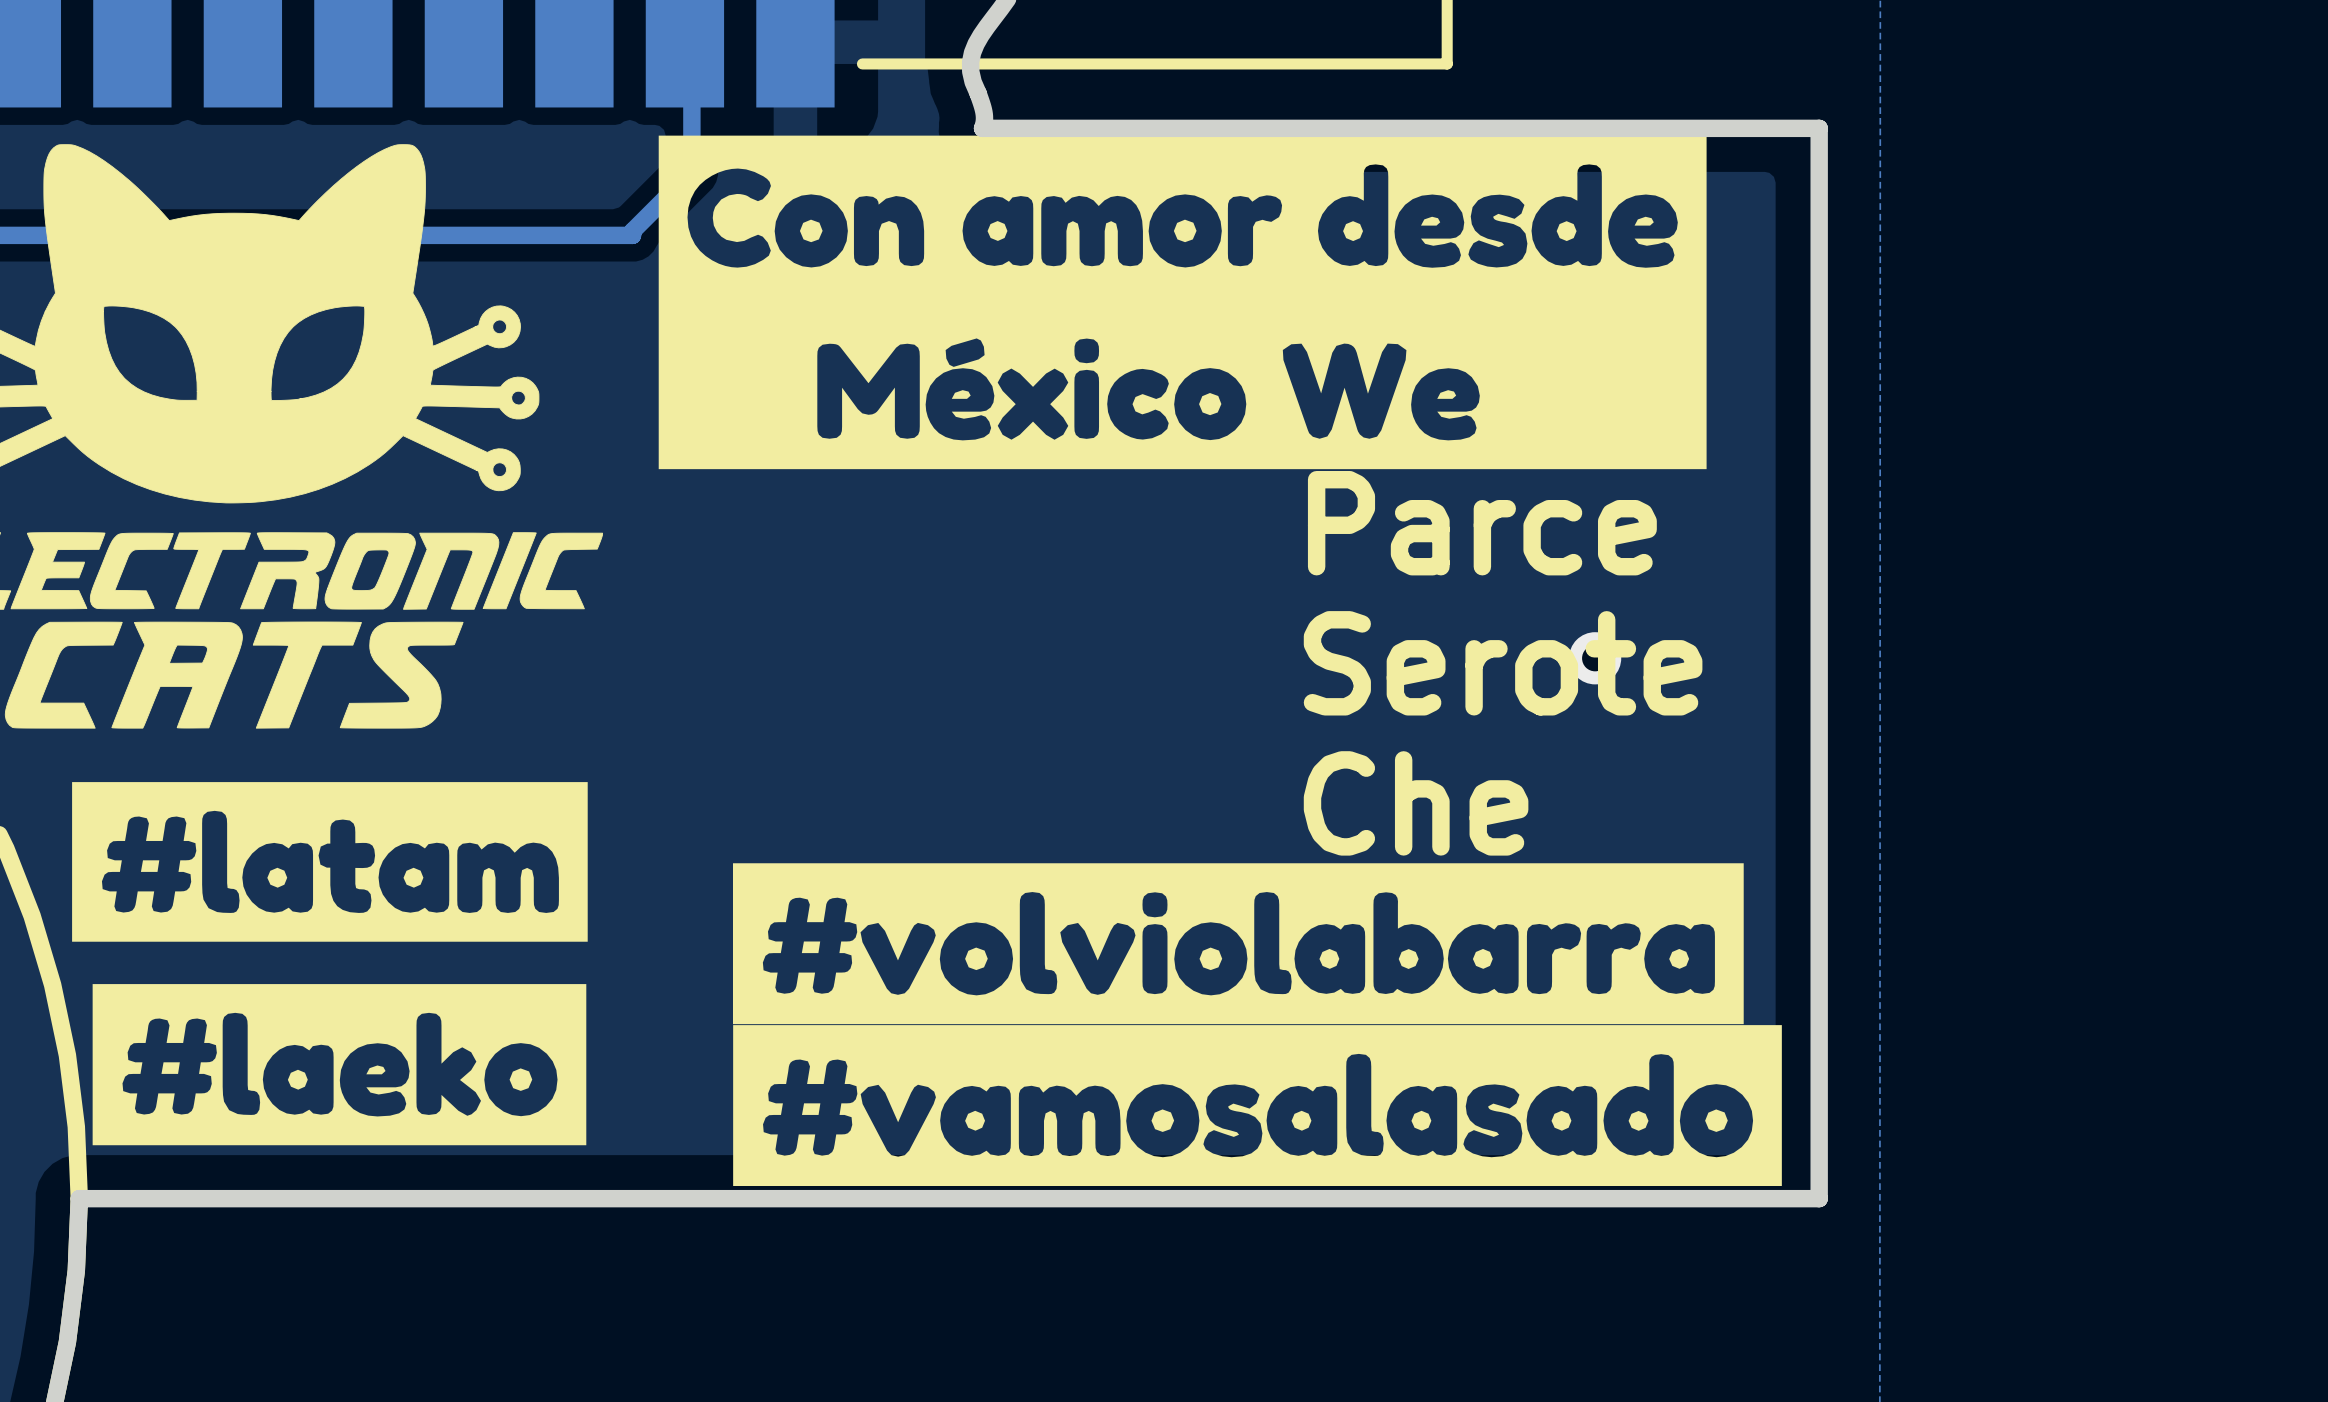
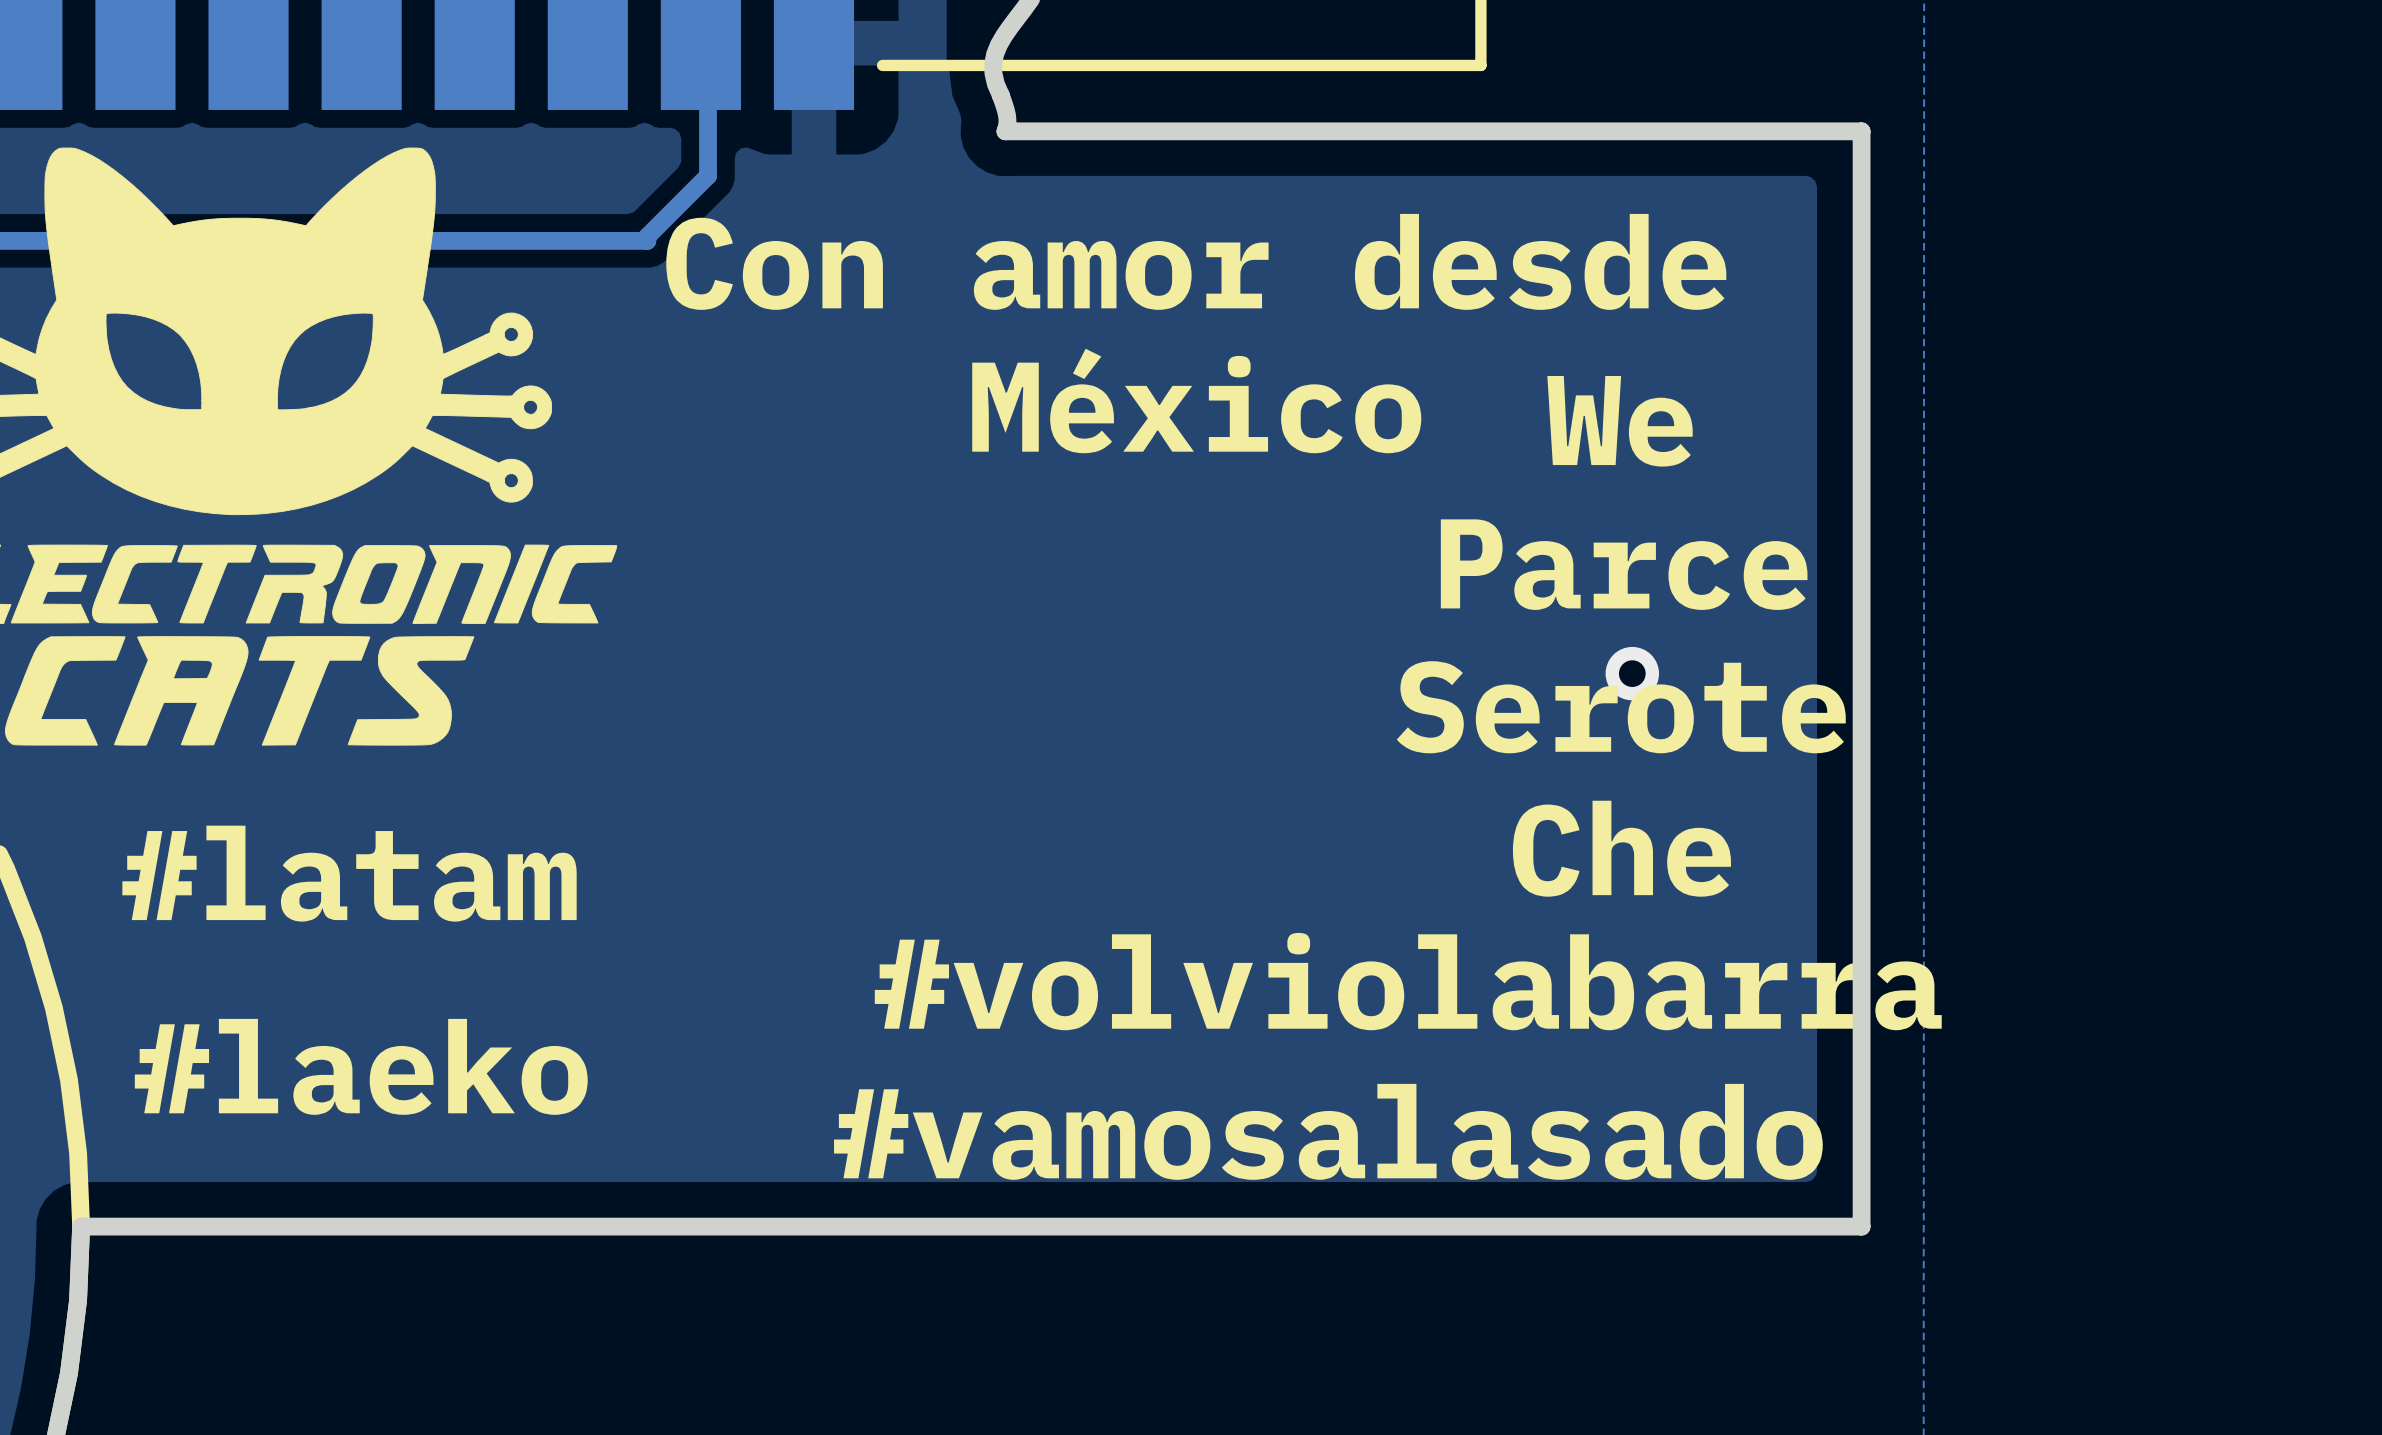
drawing: [658, 135, 1707, 470] -> none
text: none -> Con amor desde (1196, 261)
text: none -> México (1196, 400)
text: none -> We (1620, 421)
text position: Parce (1482, 523) -> Parce (1624, 564)
text position: Serote (1503, 663) -> Serote (1621, 707)
drawing: [72, 782, 588, 1146] -> none
text position: Che (1416, 803) -> Che (1621, 848)
text: none -> #latam (349, 873)
drawing: [732, 863, 1782, 1187] -> none
text: none -> #volviolabarra (1408, 981)
text: none -> #laeko (361, 1066)
text: none -> #vamosalasado (1328, 1131)

